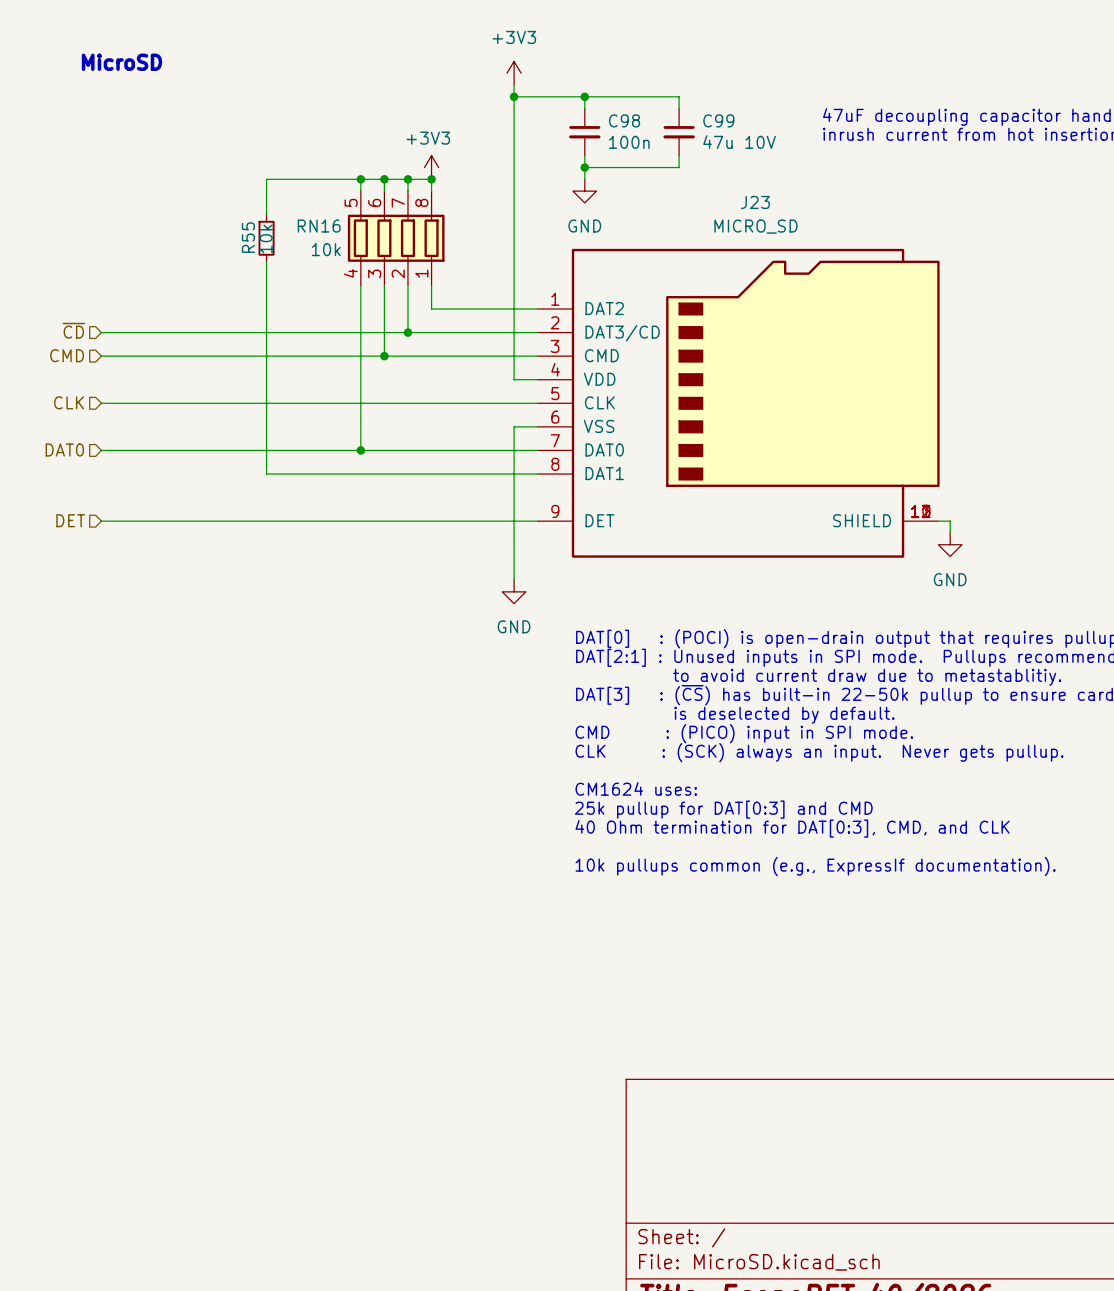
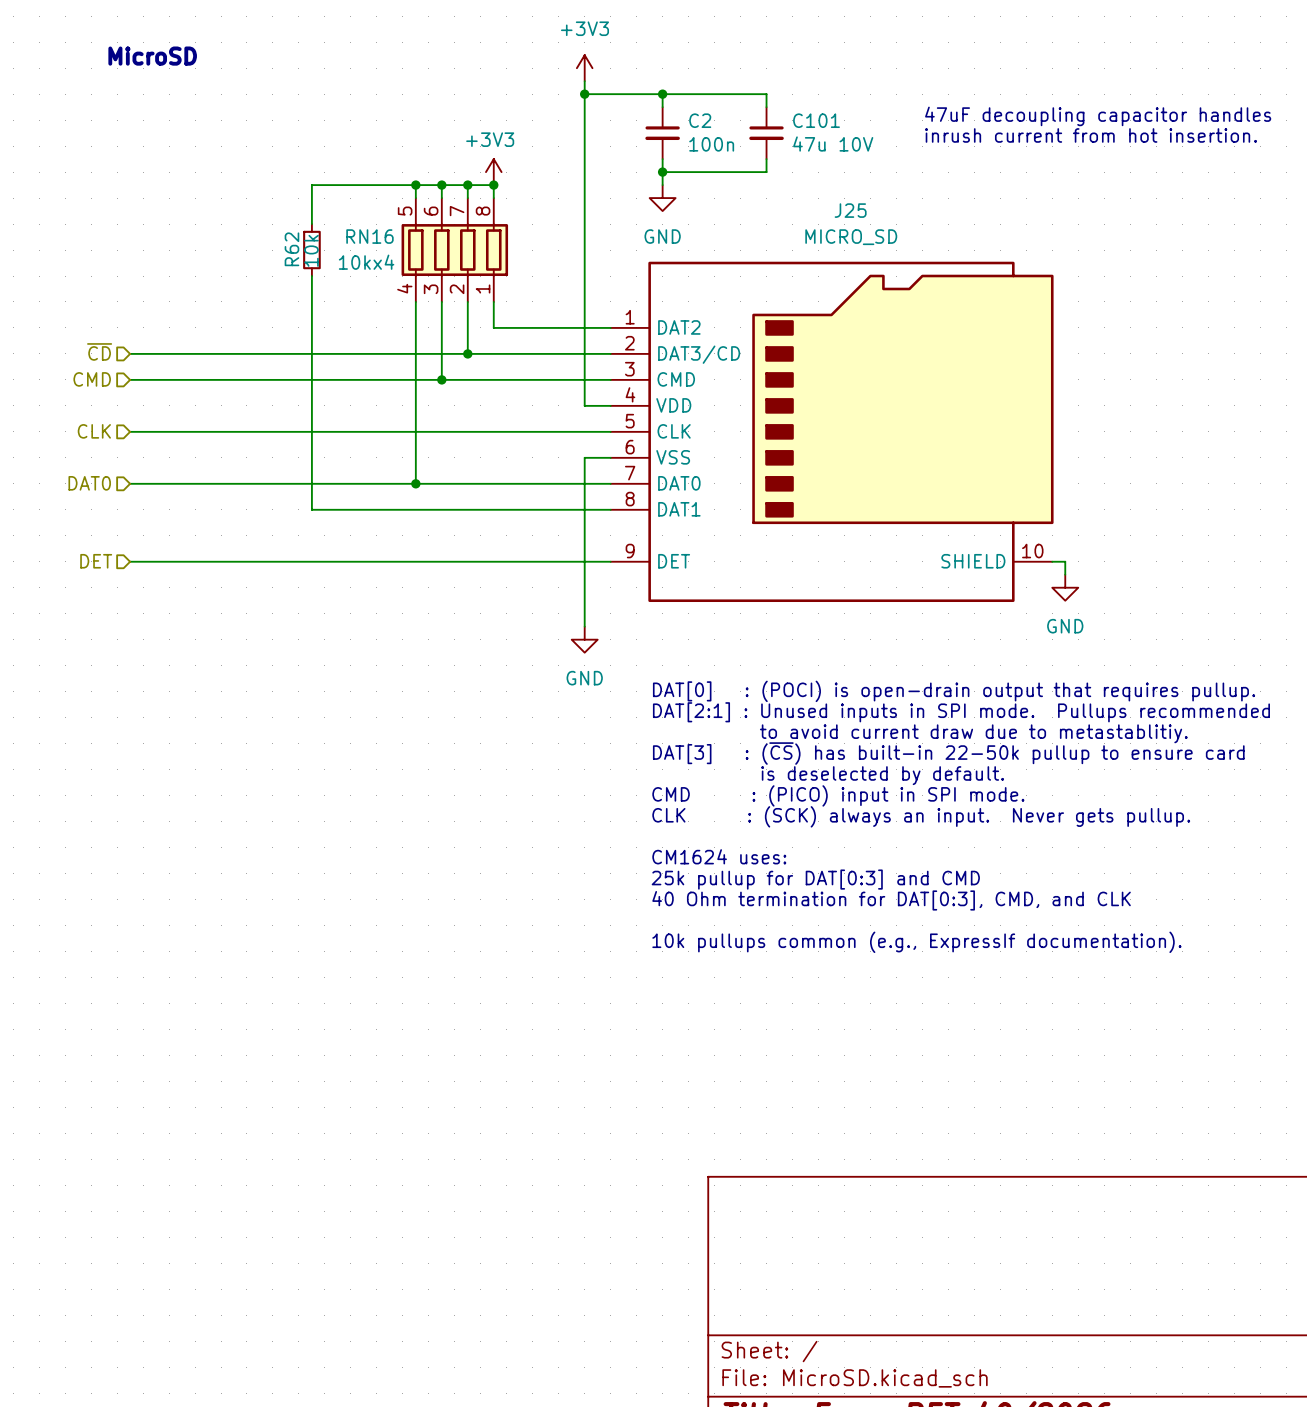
C98 name: C98 (624, 120) -> C2 (700, 120)
C99 name: C99 (718, 120) -> C101 (816, 120)
R55 name: R55 (248, 237) -> R62 (291, 249)
RN16 value: 10k (326, 249) -> 10kx4 (366, 262)
J23: MICRO_SD (738, 403) -> none
J25: none -> MICRO_SD (832, 431)

